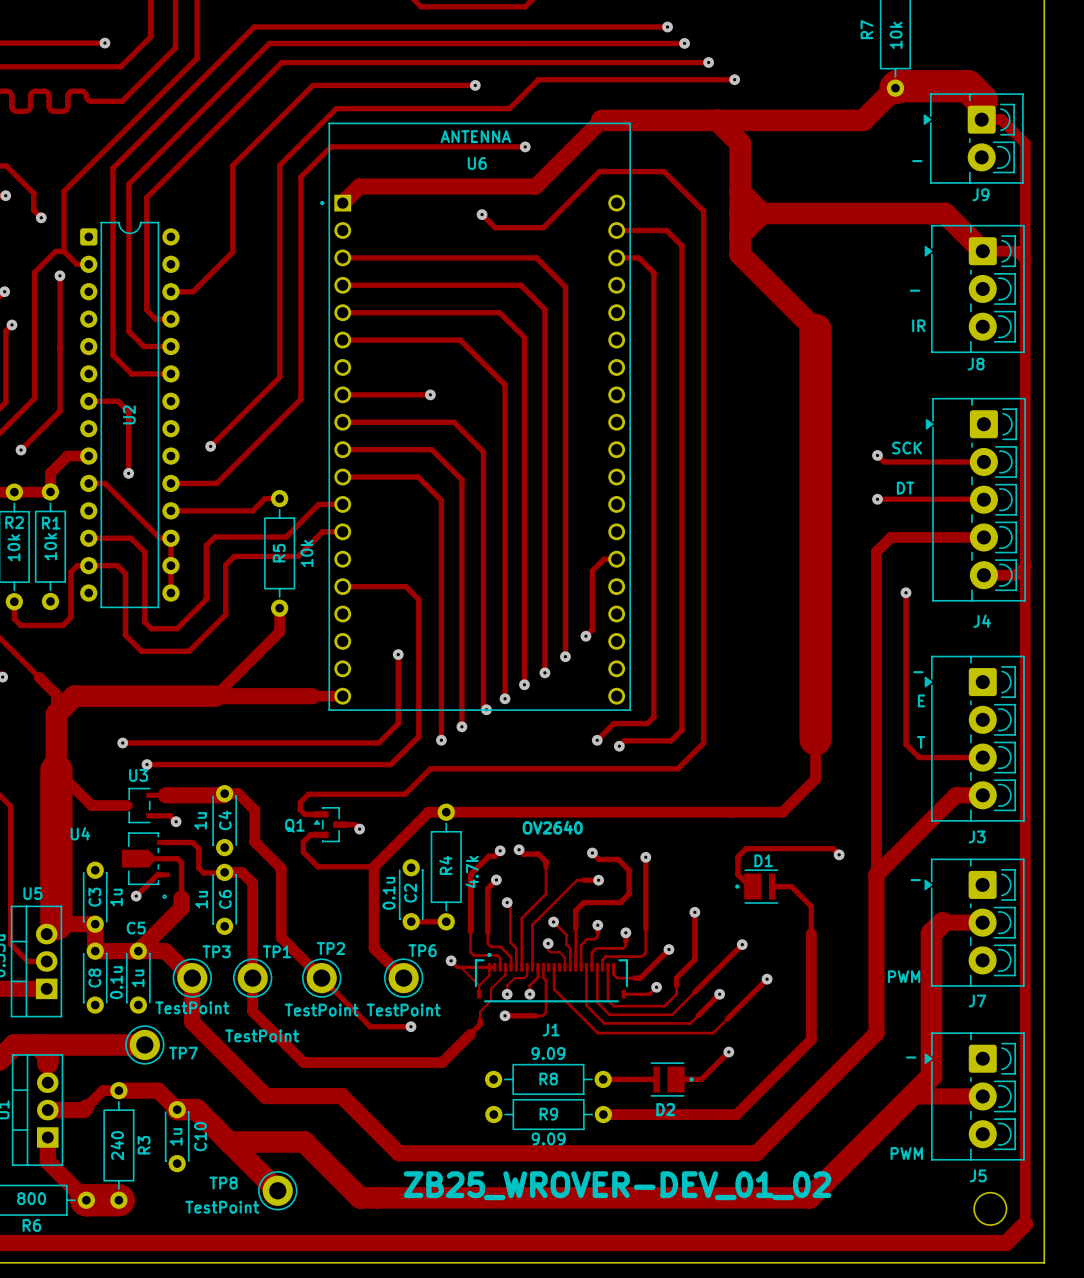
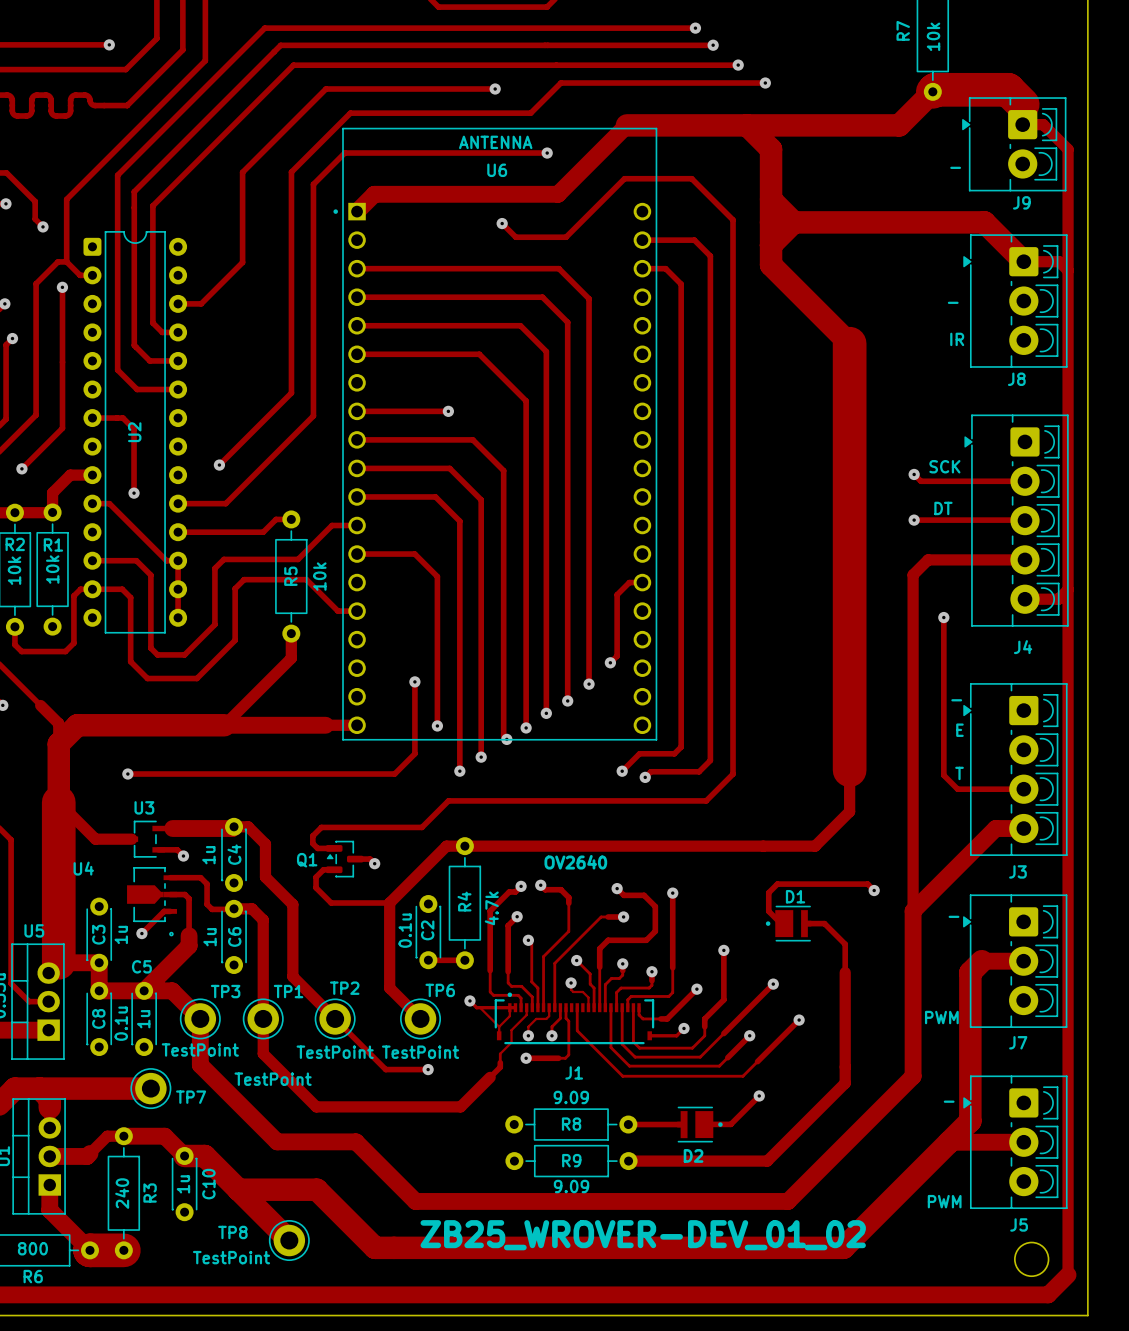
track: (342, 531) (322, 531) (297, 556) (294, 556) -> (357, 611) (337, 611) (306, 579)
track: none -> (357, 554) (414, 554) (437, 576) (437, 725)
track: (342, 586) (405, 586) (418, 599) (418, 736) (390, 764) (147, 764) -> none
via: none -> (437, 725)
via: (147, 764) -> none

